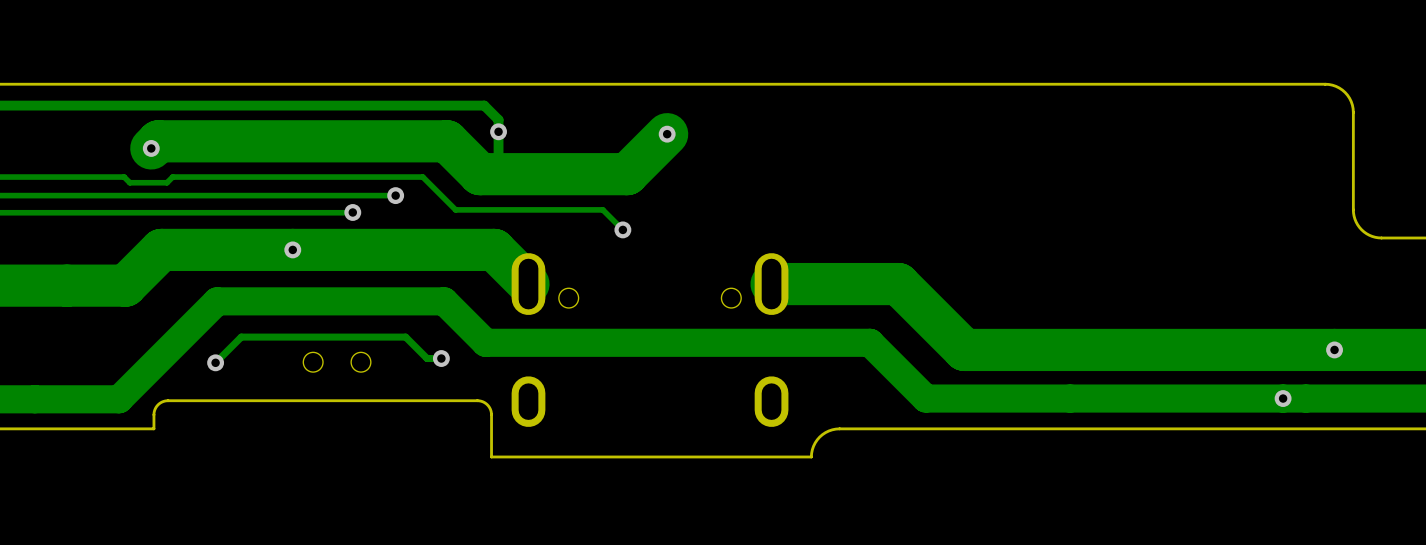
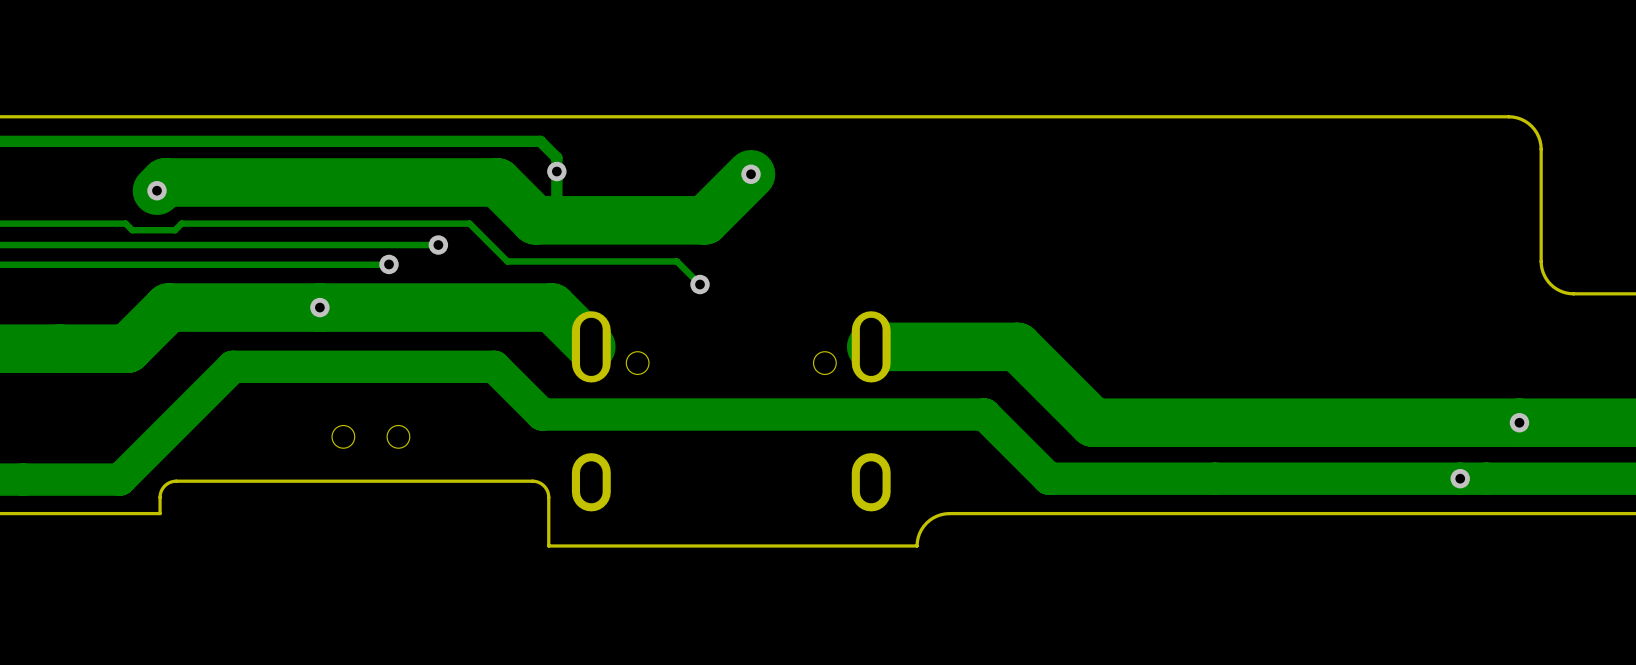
track: (441, 358) (427, 358) (405, 337) (241, 337) (215, 362) -> none
via: (441, 358) -> none
via: (215, 362) -> none

